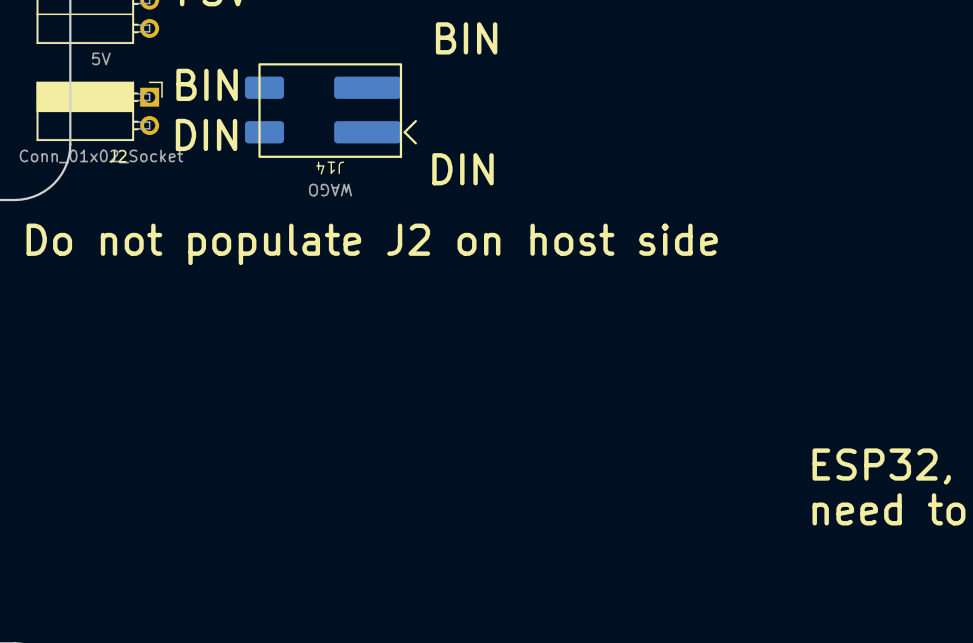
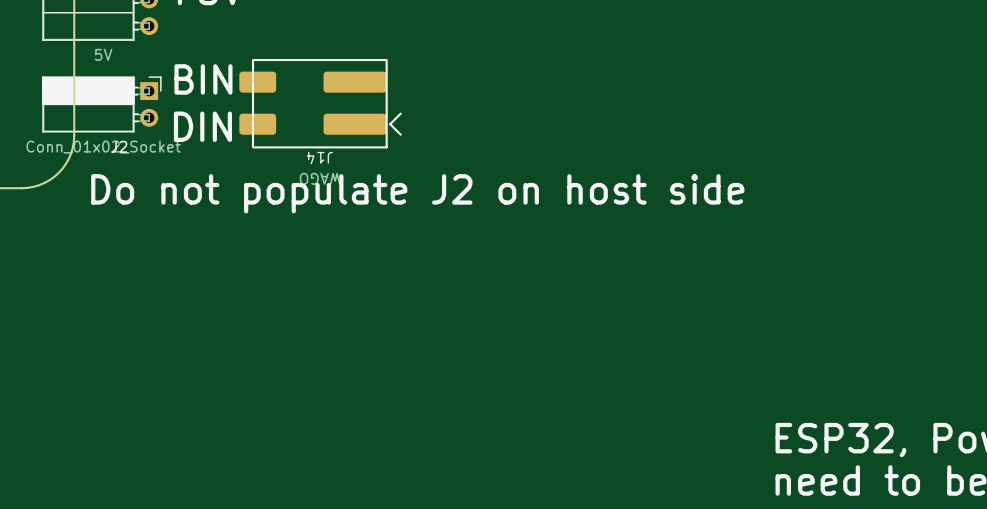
text: BIN (466, 38) -> none
text: DIN (462, 169) -> none
text position: Do not populate J2 on host side (372, 244) -> Do not populate J2 on host side (417, 193)

